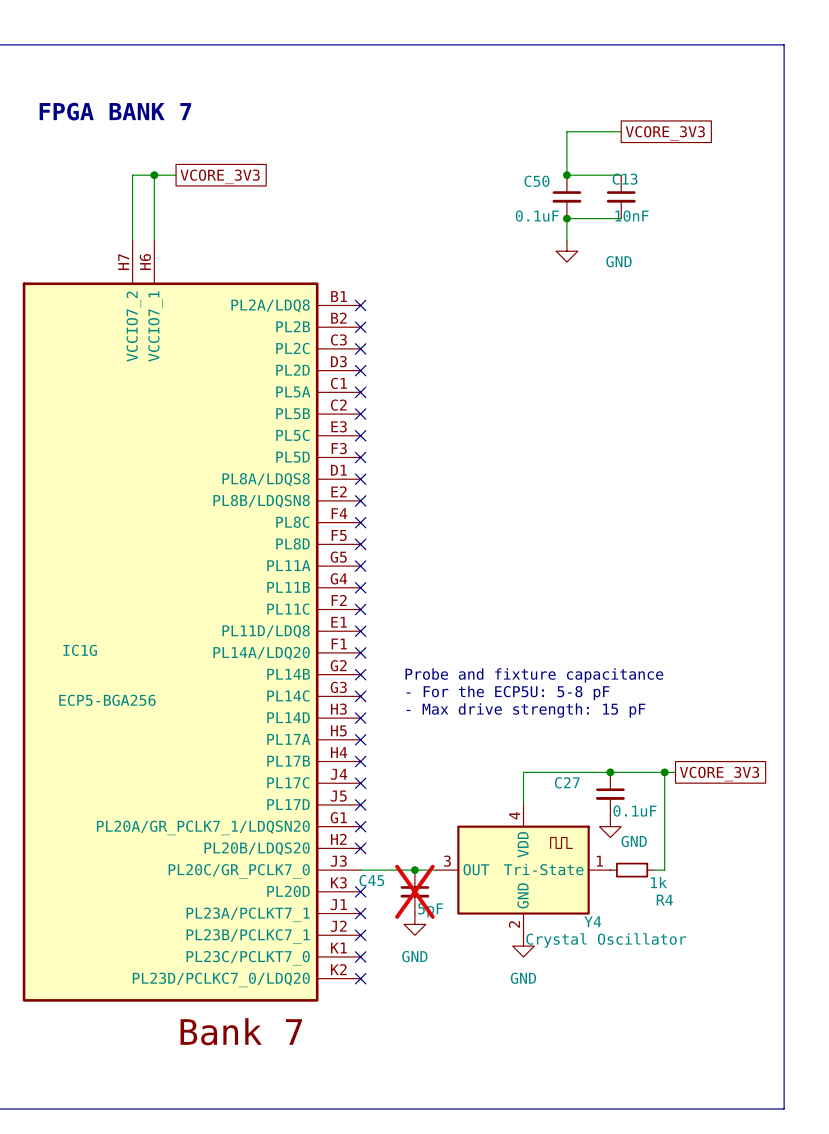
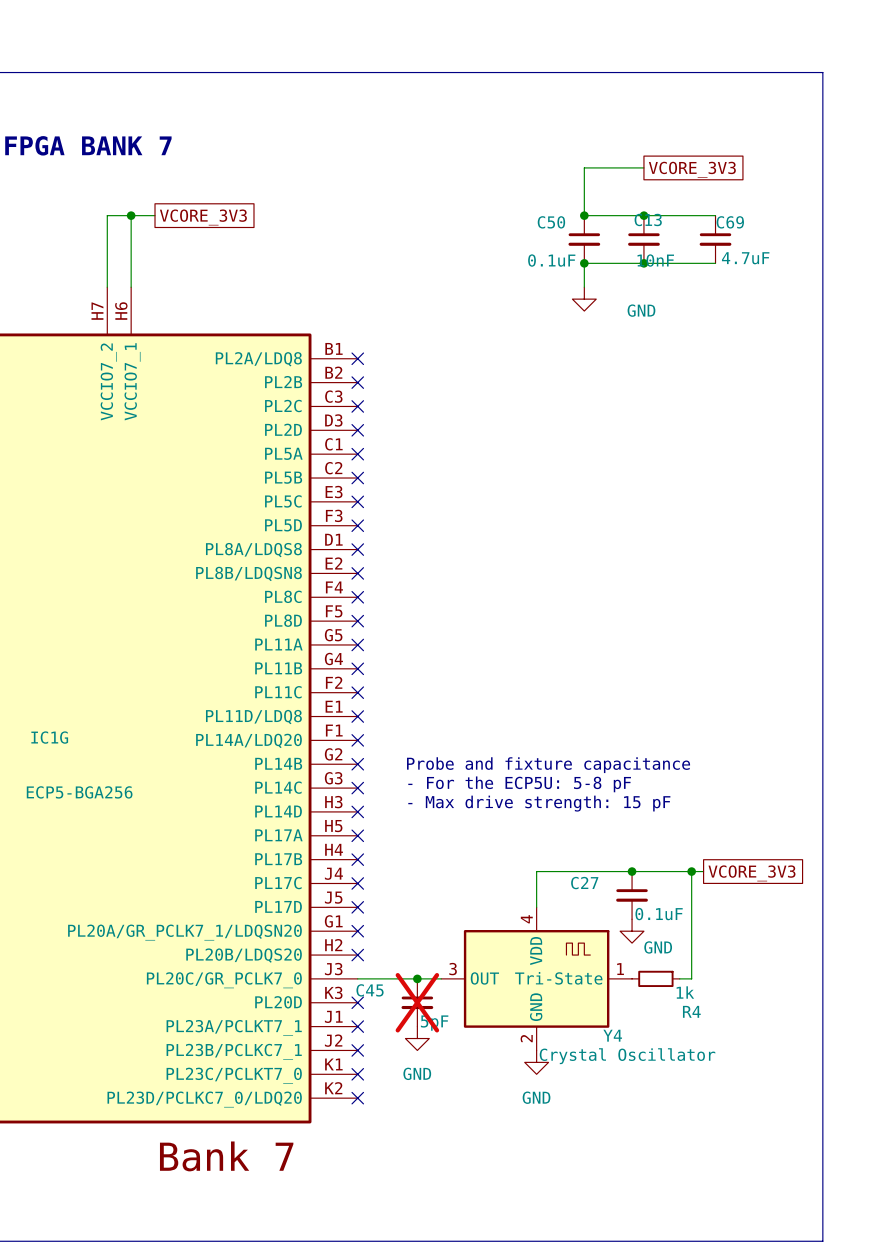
wire: none -> (643, 215) (715, 215)
junction: none -> (643, 215)
C69: none -> 4.7uF (715, 239)
wire: none -> (643, 263) (715, 263)
junction: none -> (643, 263)

